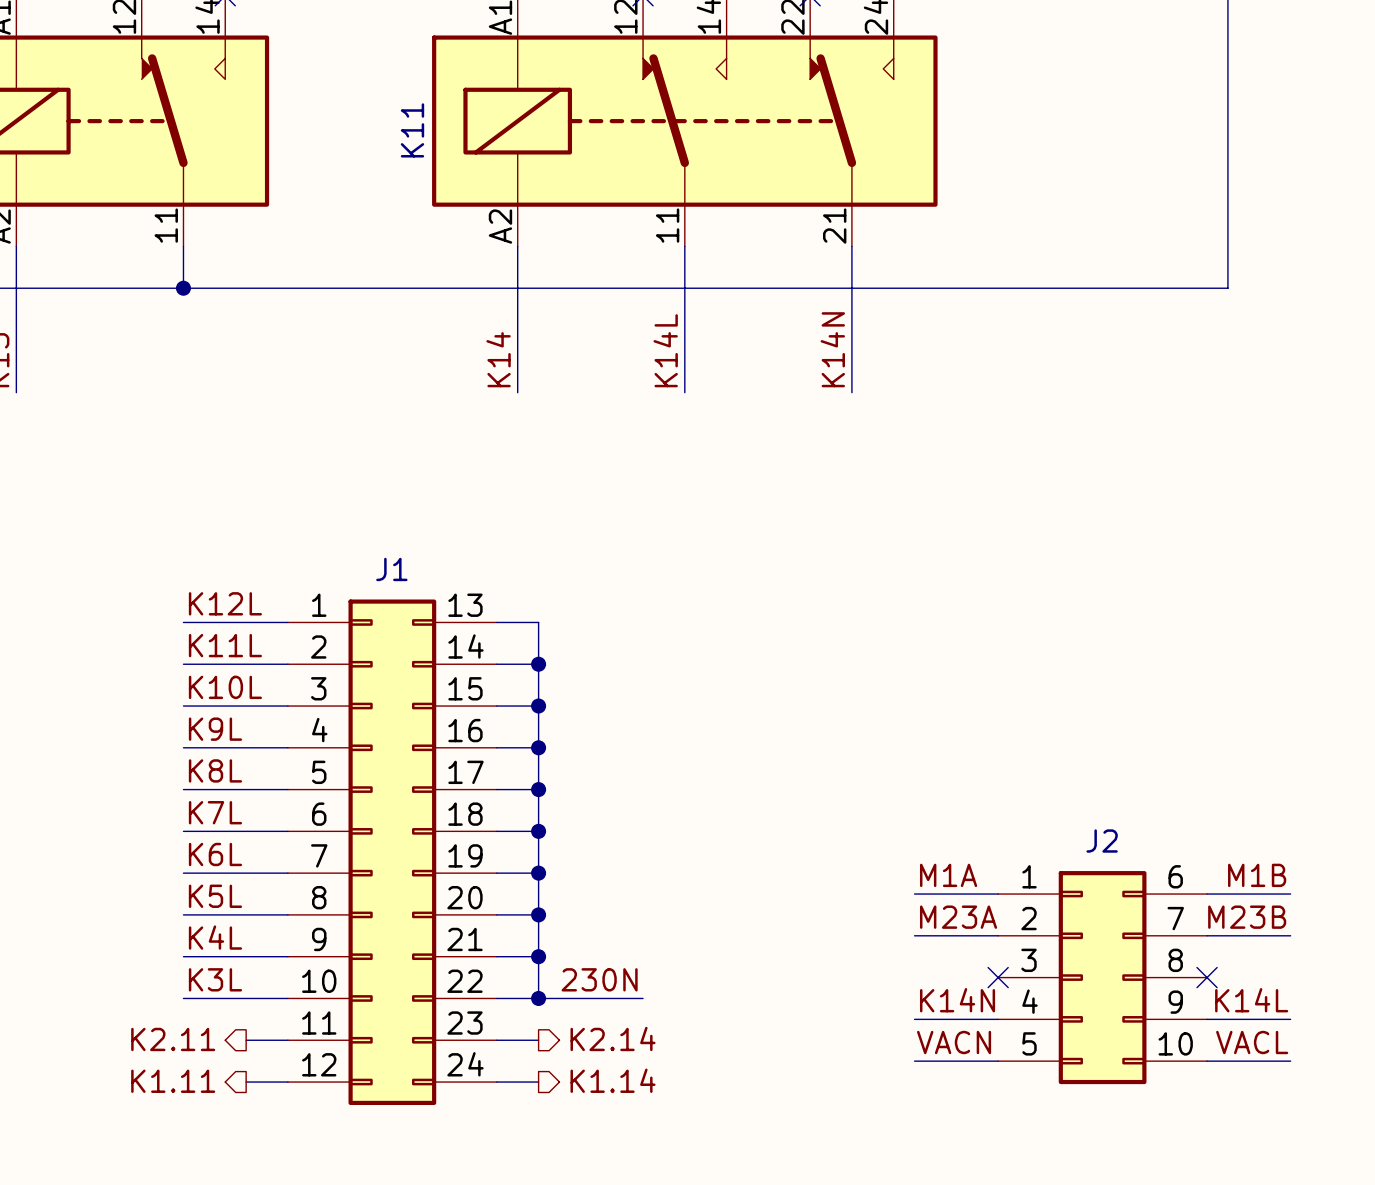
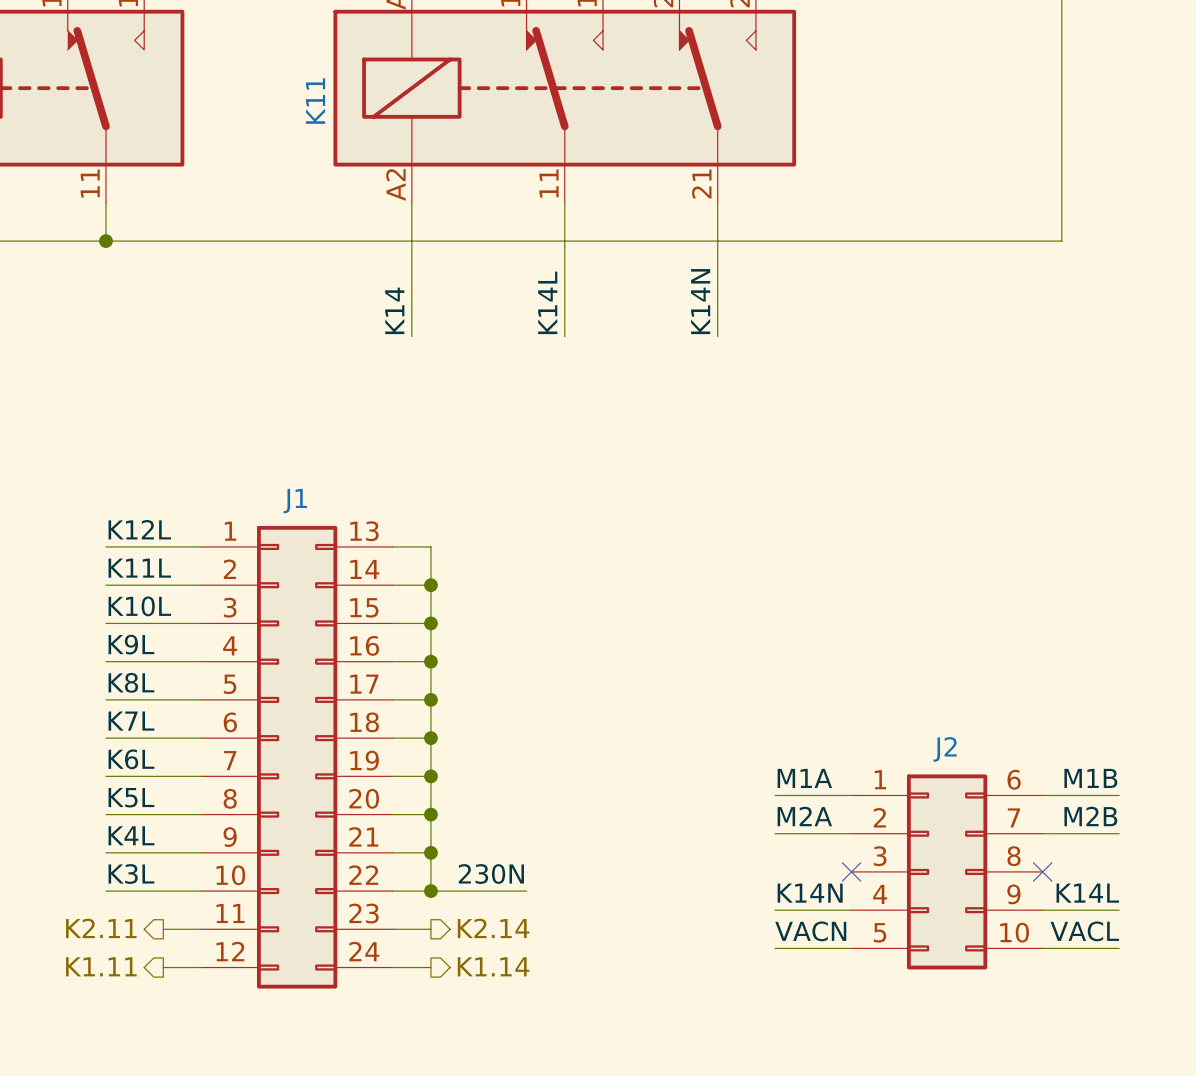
label: M23A (958, 917) -> M2A (804, 816)
label: M23B (1247, 917) -> M2B (1090, 816)

